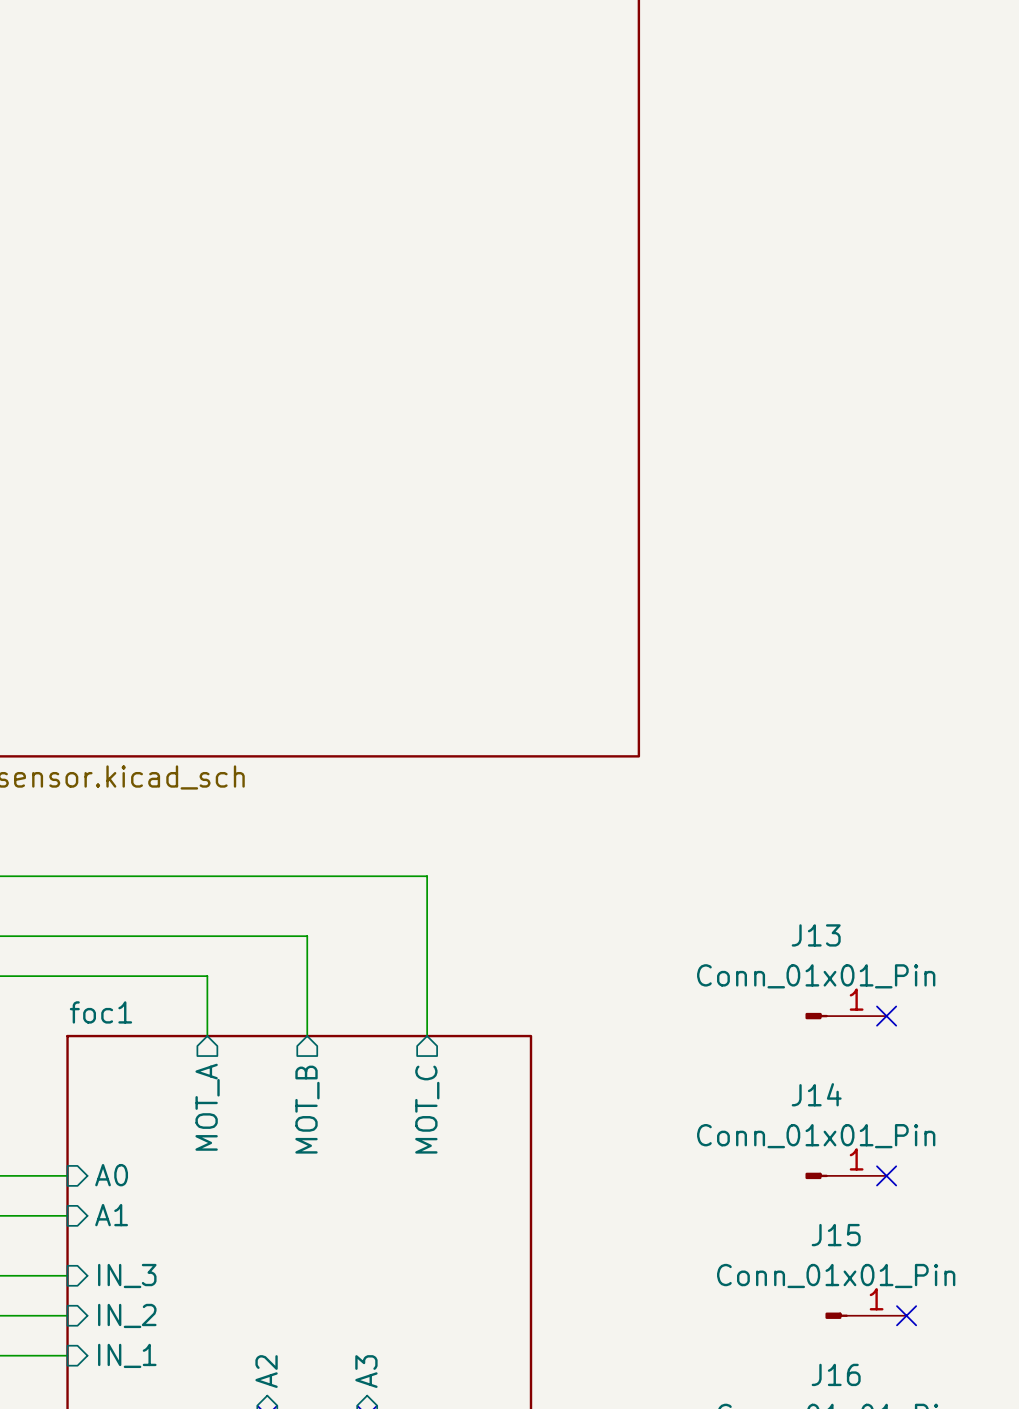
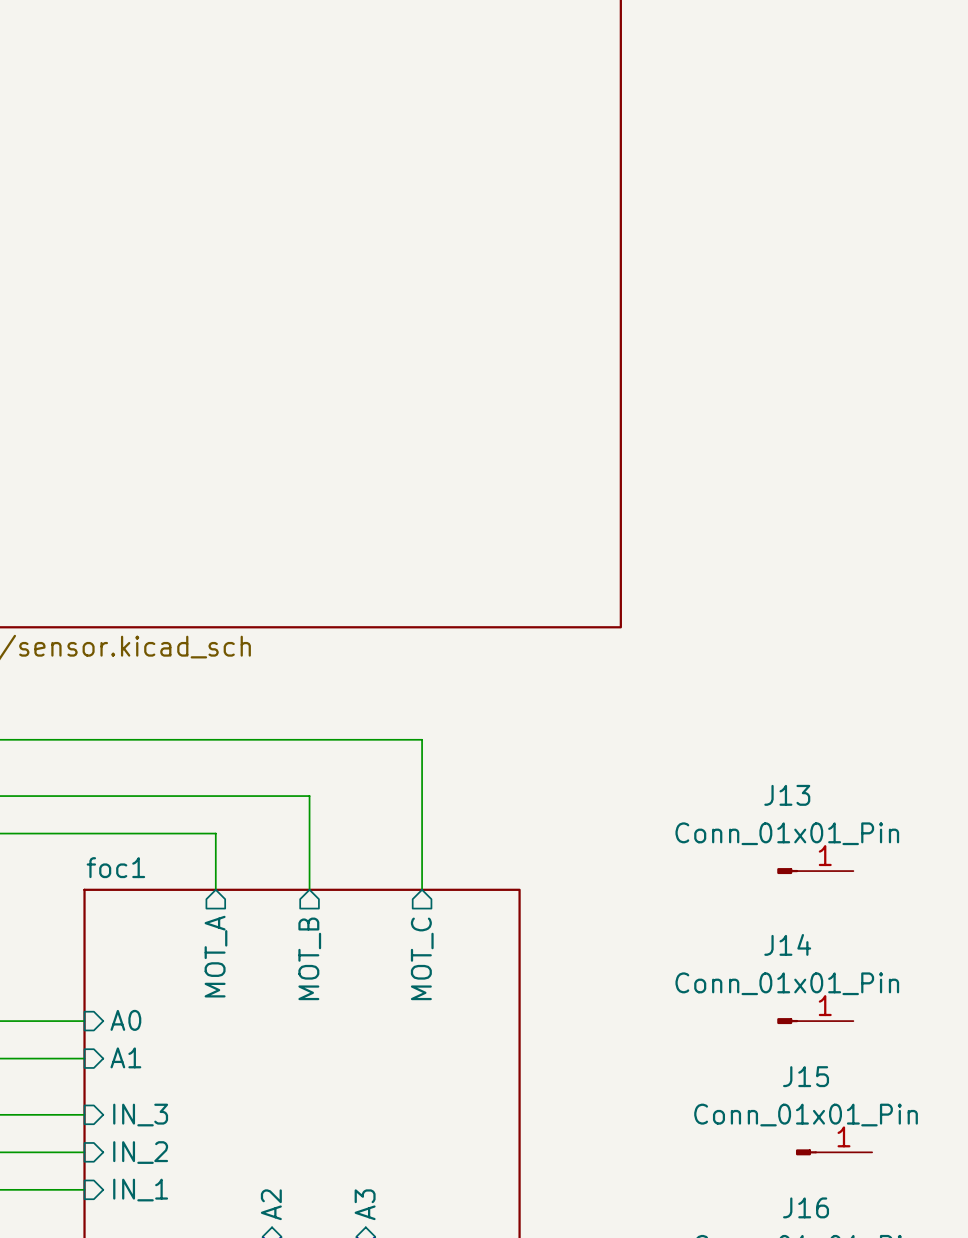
no-connect mark: (886, 1016) -> none
no-connect mark: (886, 1175) -> none
no-connect mark: (906, 1315) -> none

